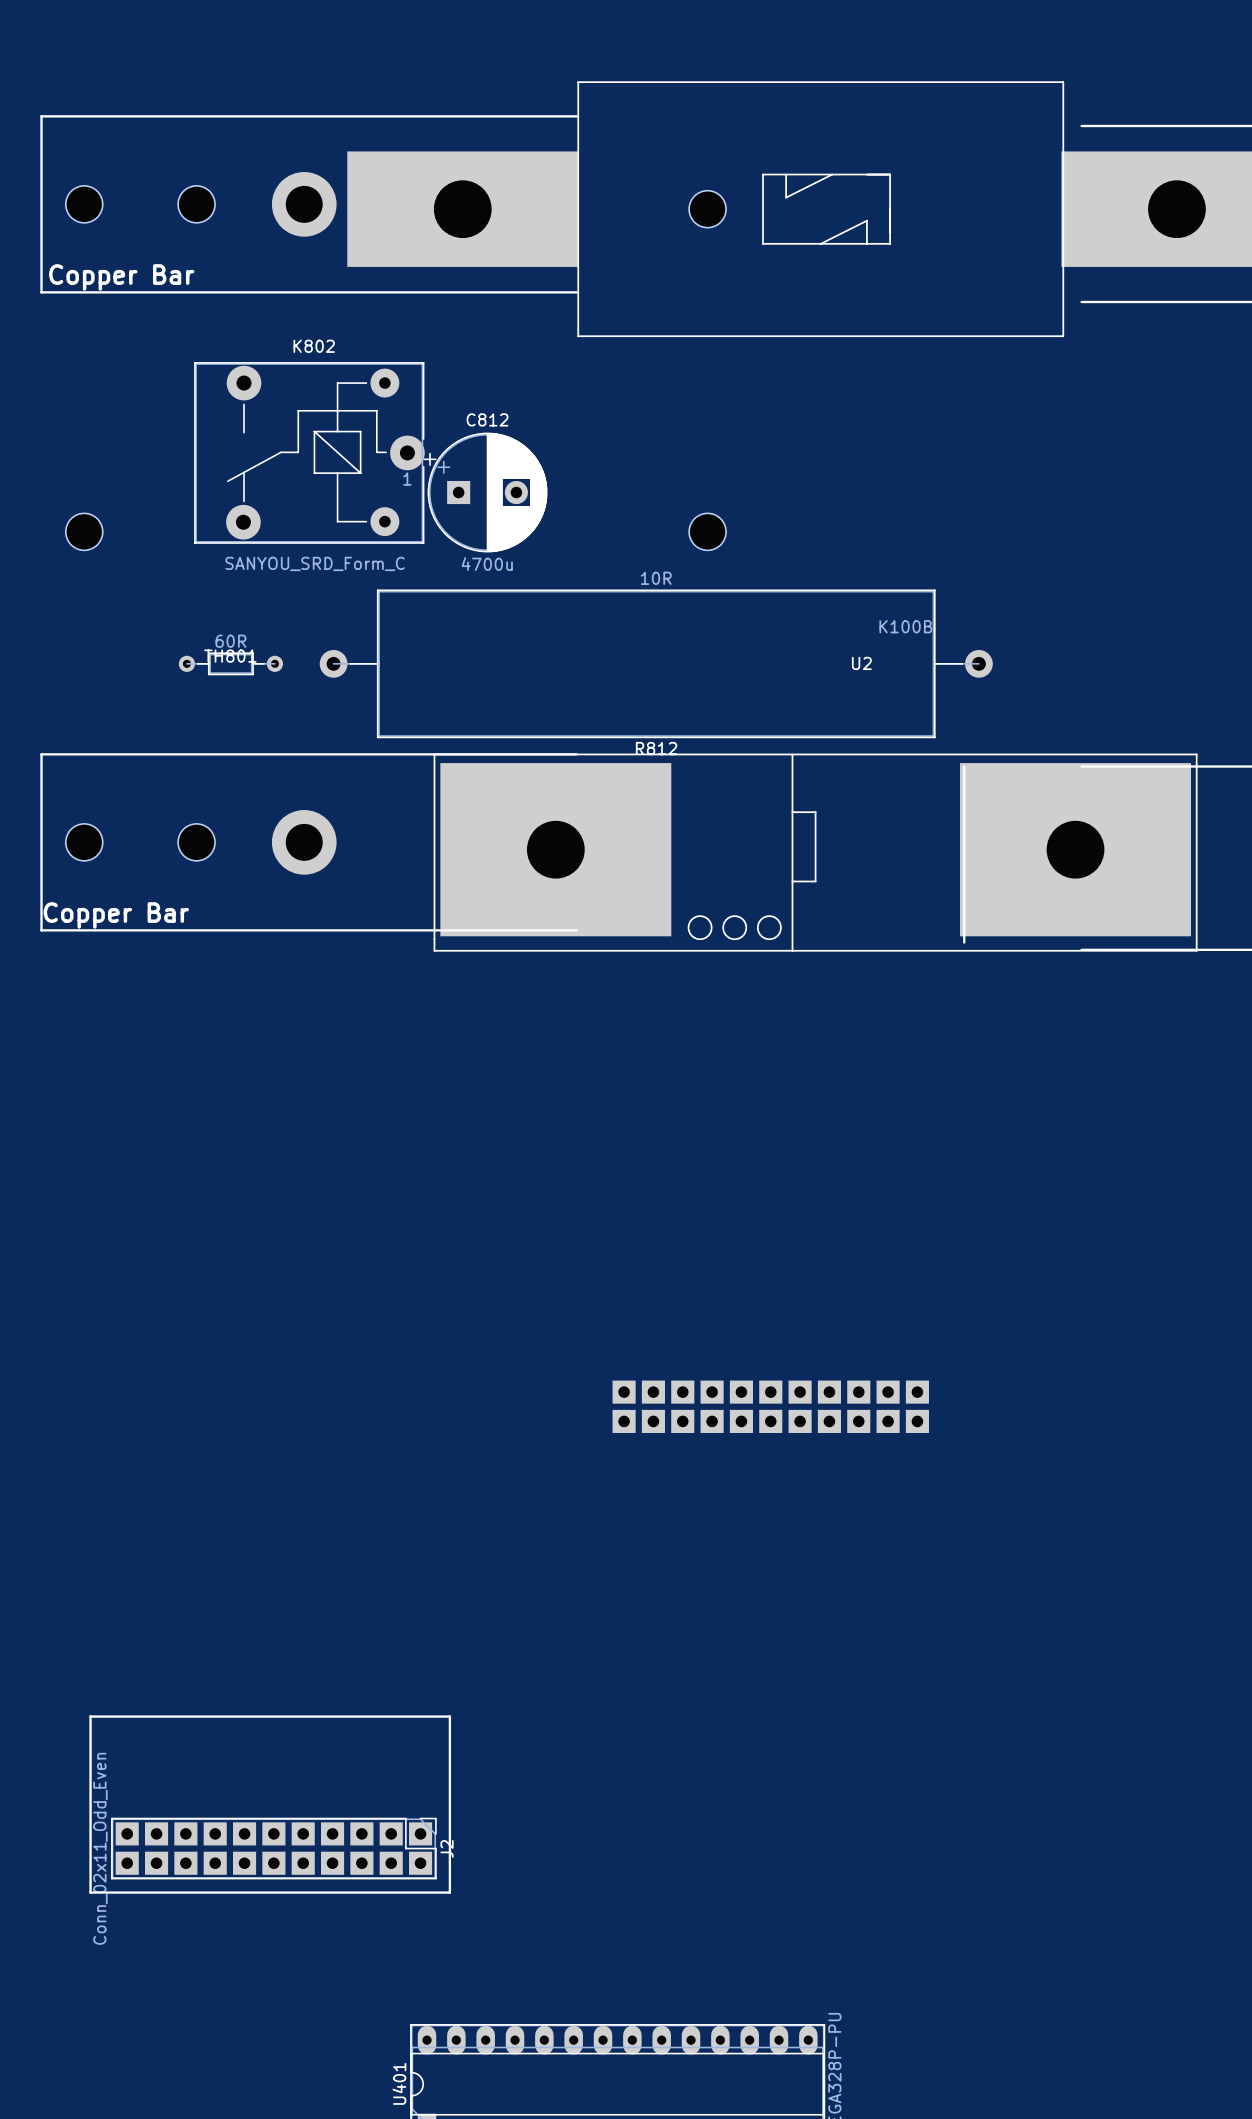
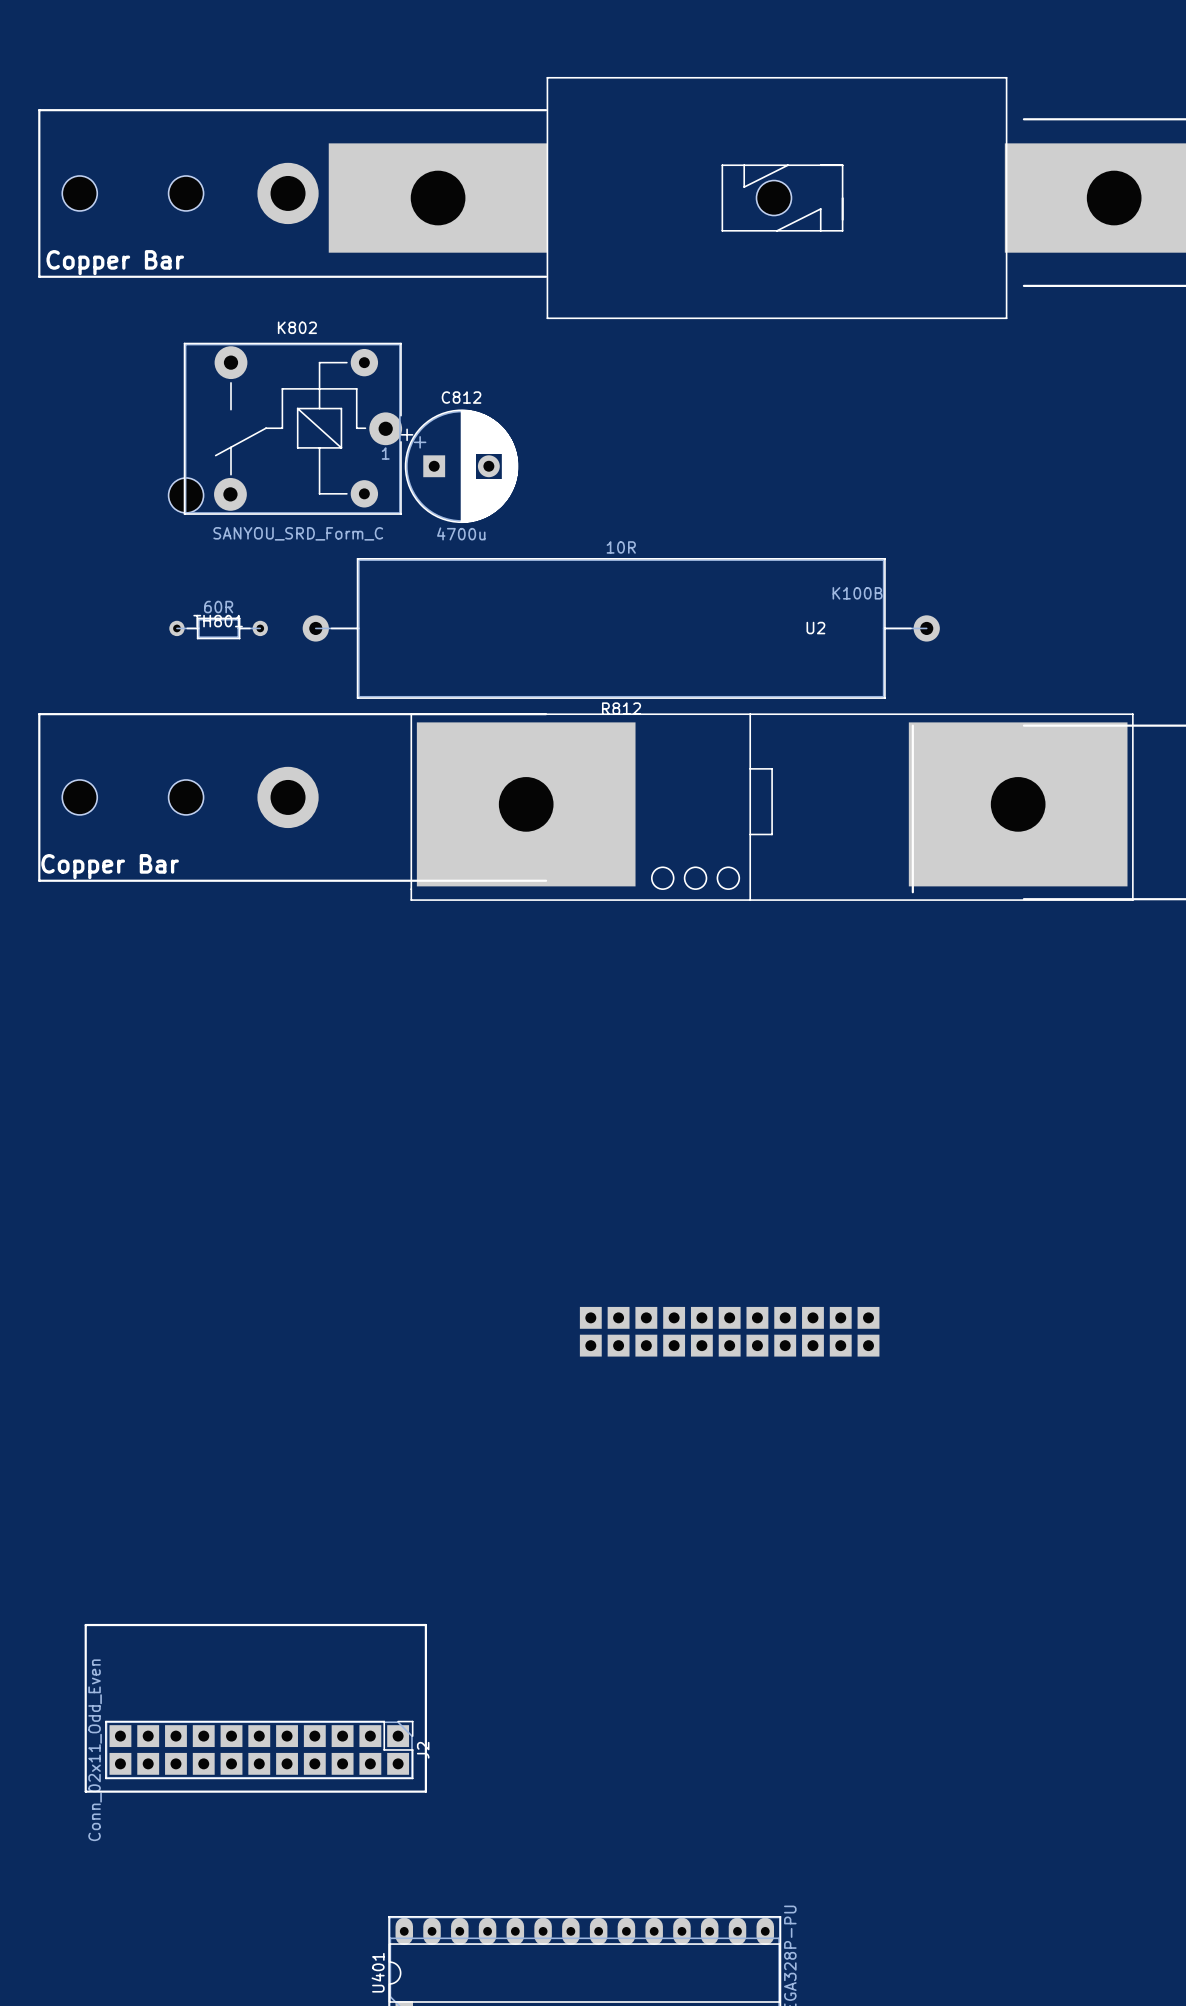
part position: (707, 209) -> (773, 198)
part position: (84, 531) -> (186, 495)
part: (707, 531) -> none

